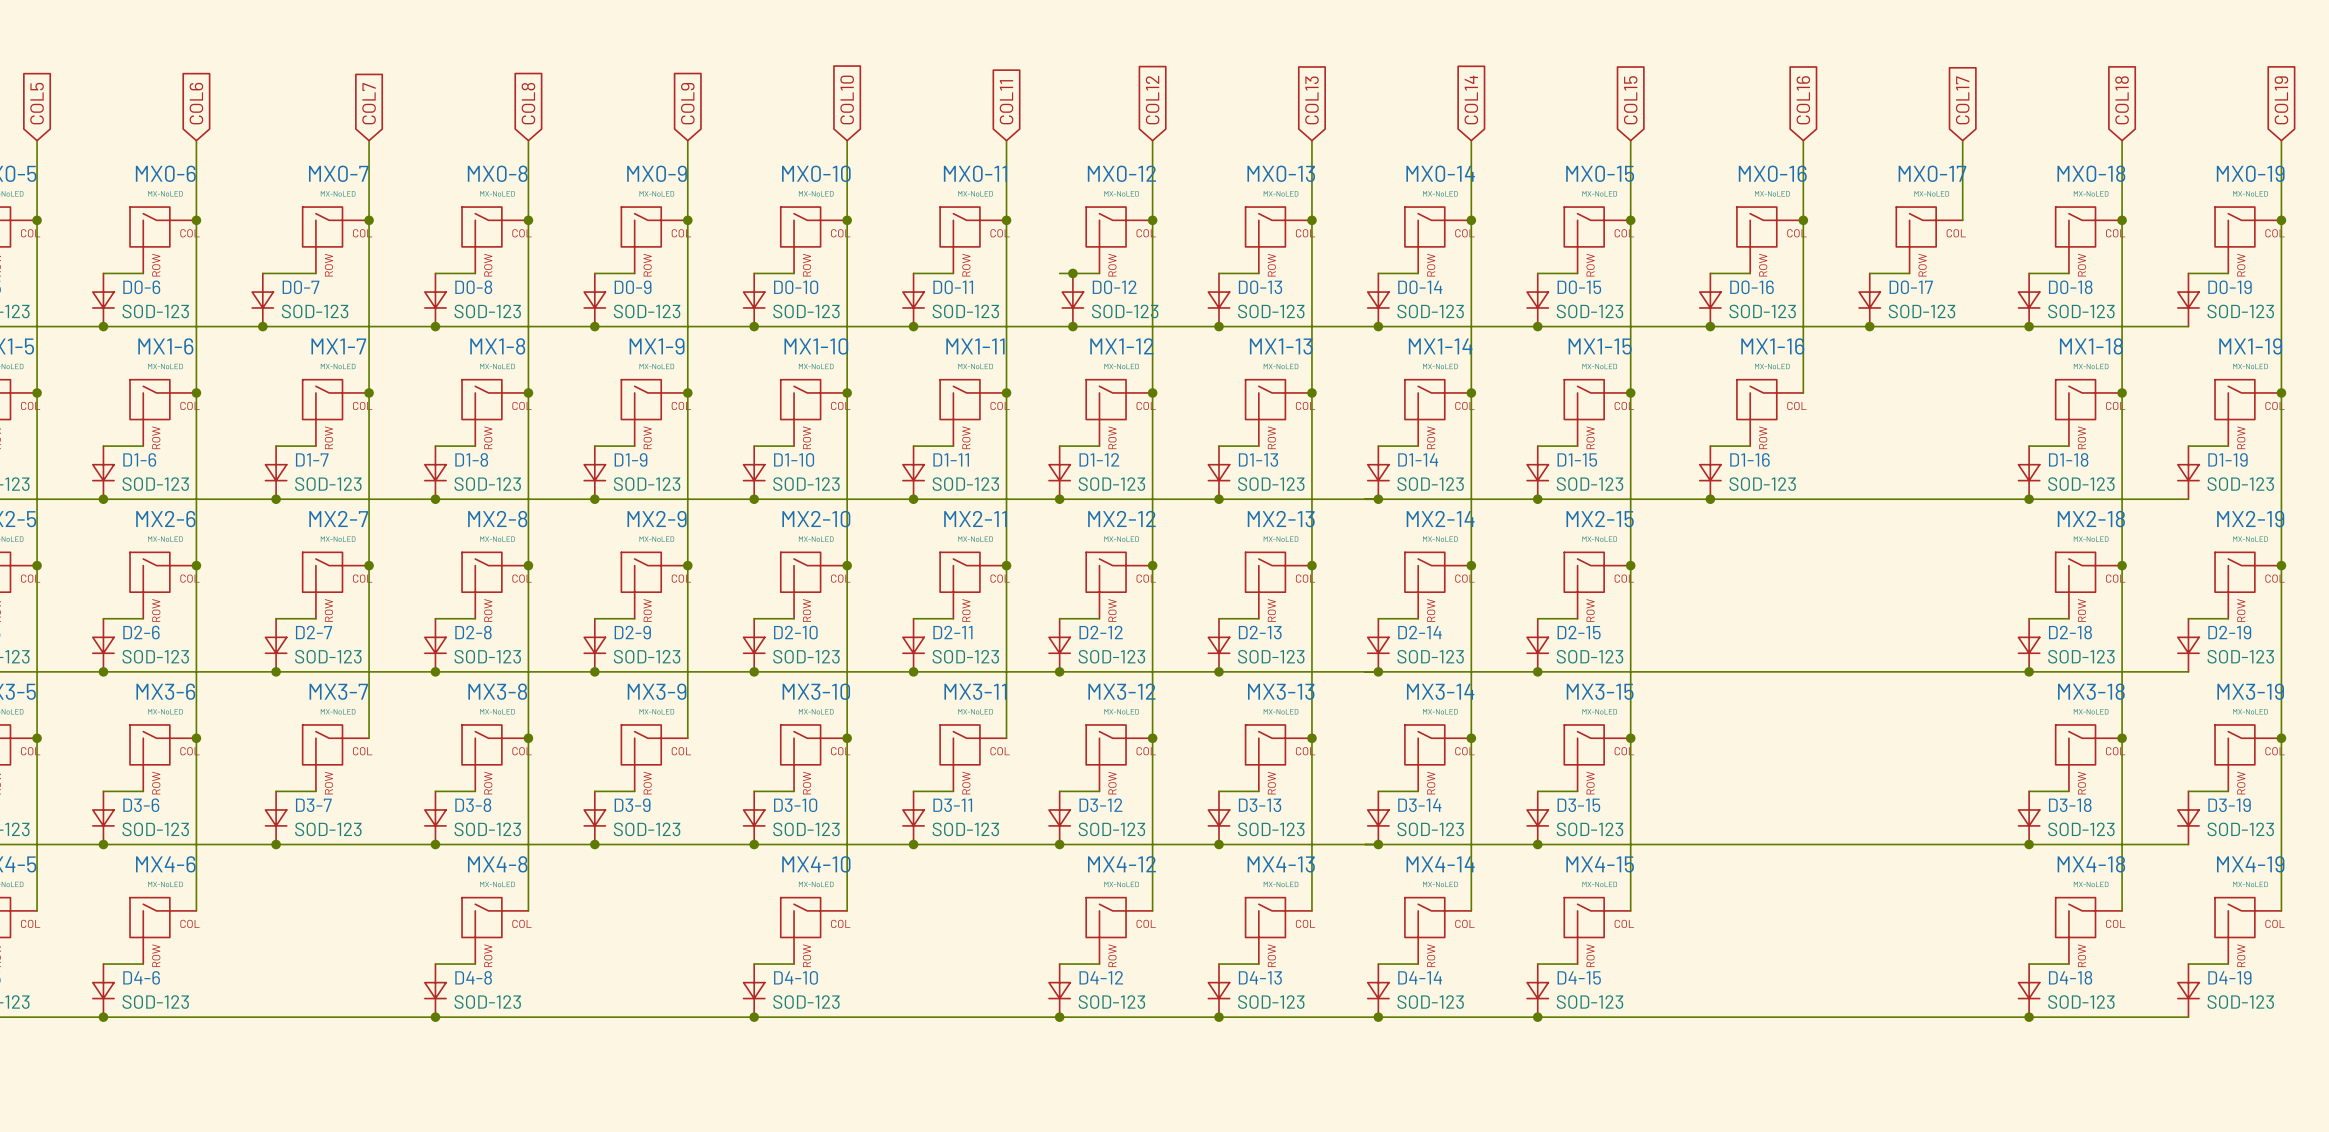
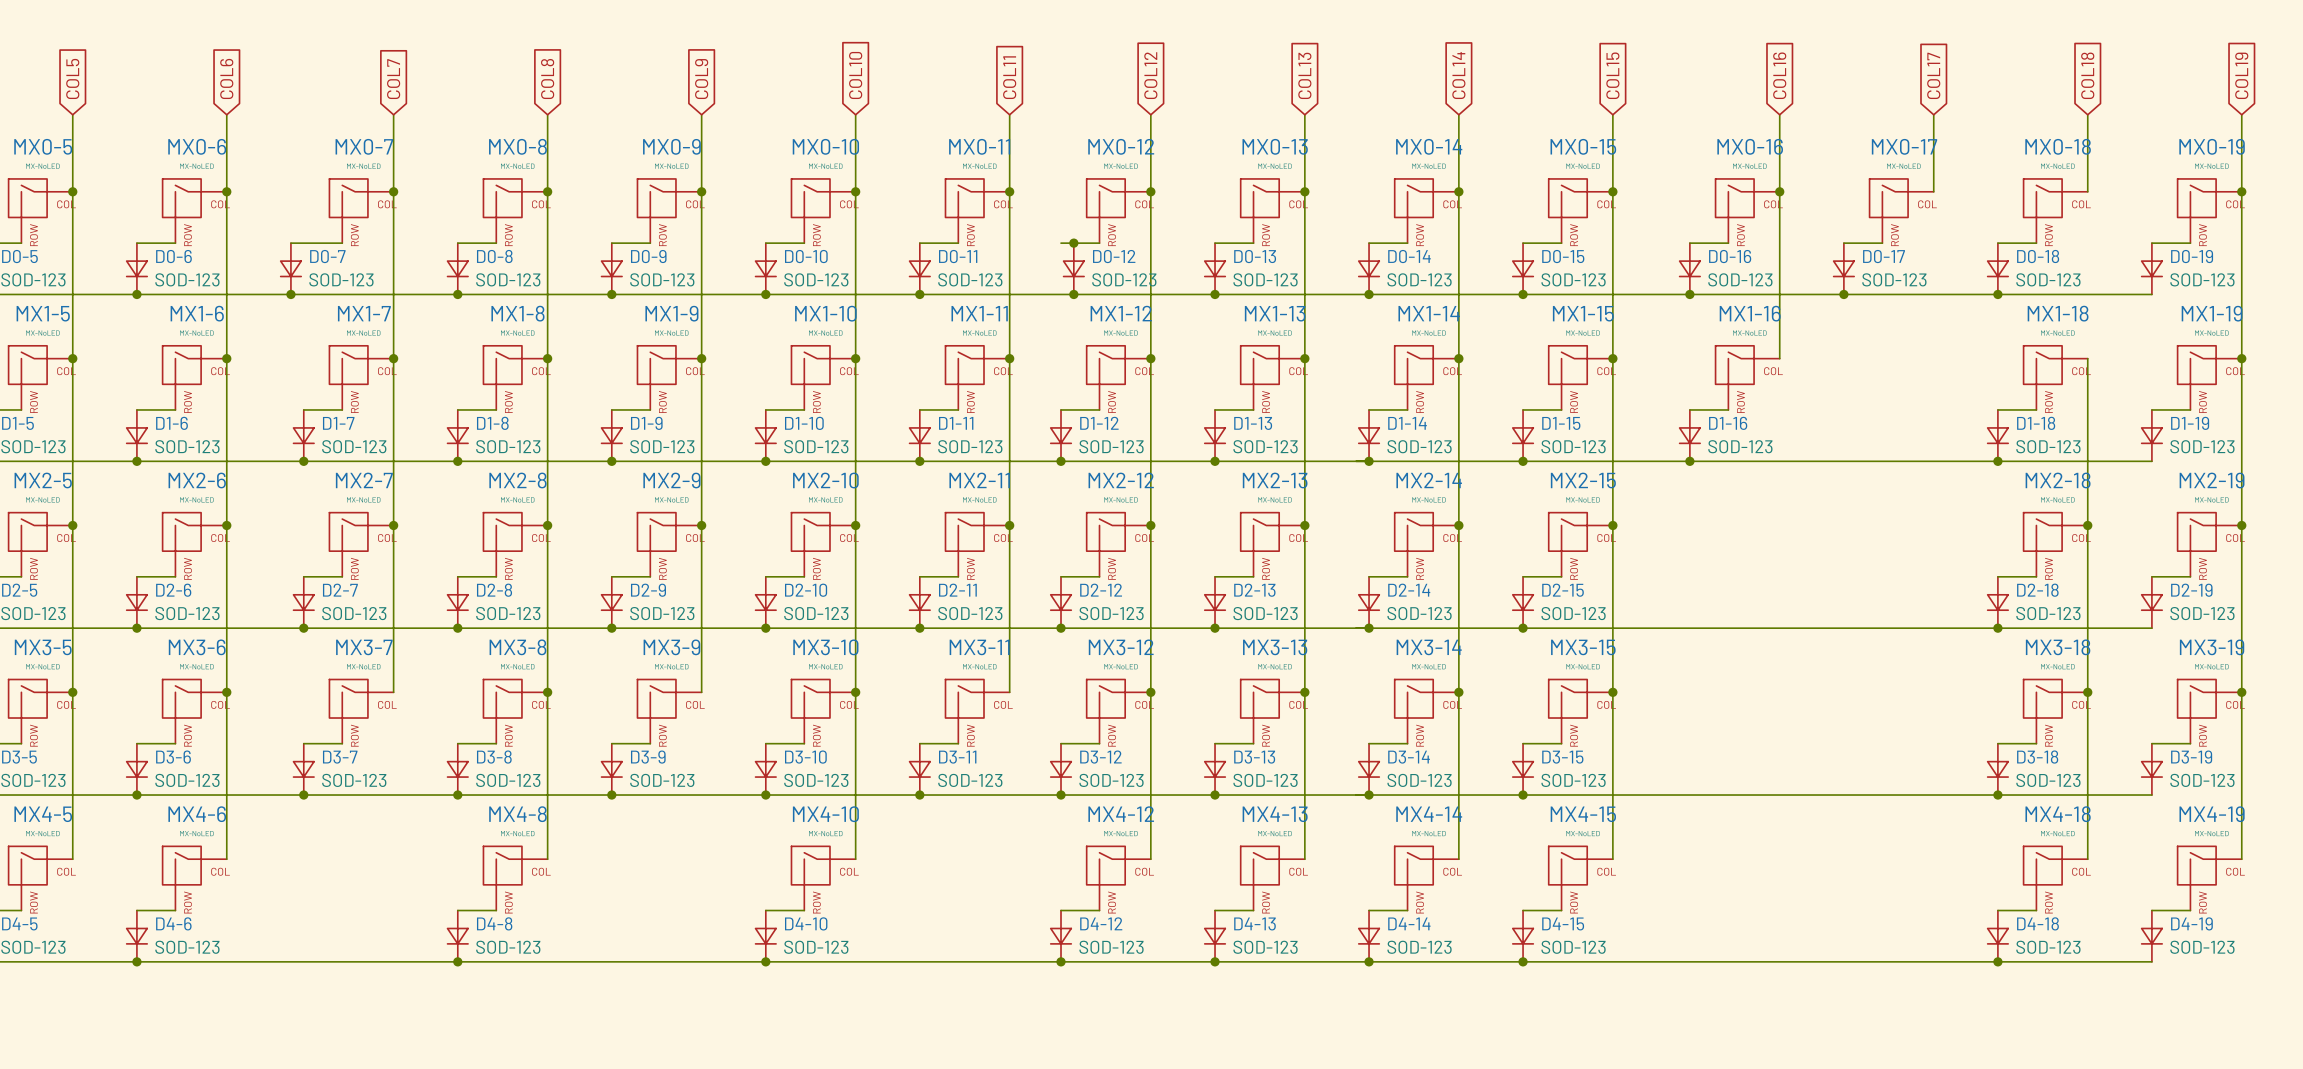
wire: (2122, 220) (2122, 392) -> none
junction: (2122, 220) -> none
junction: (2122, 392) -> none

